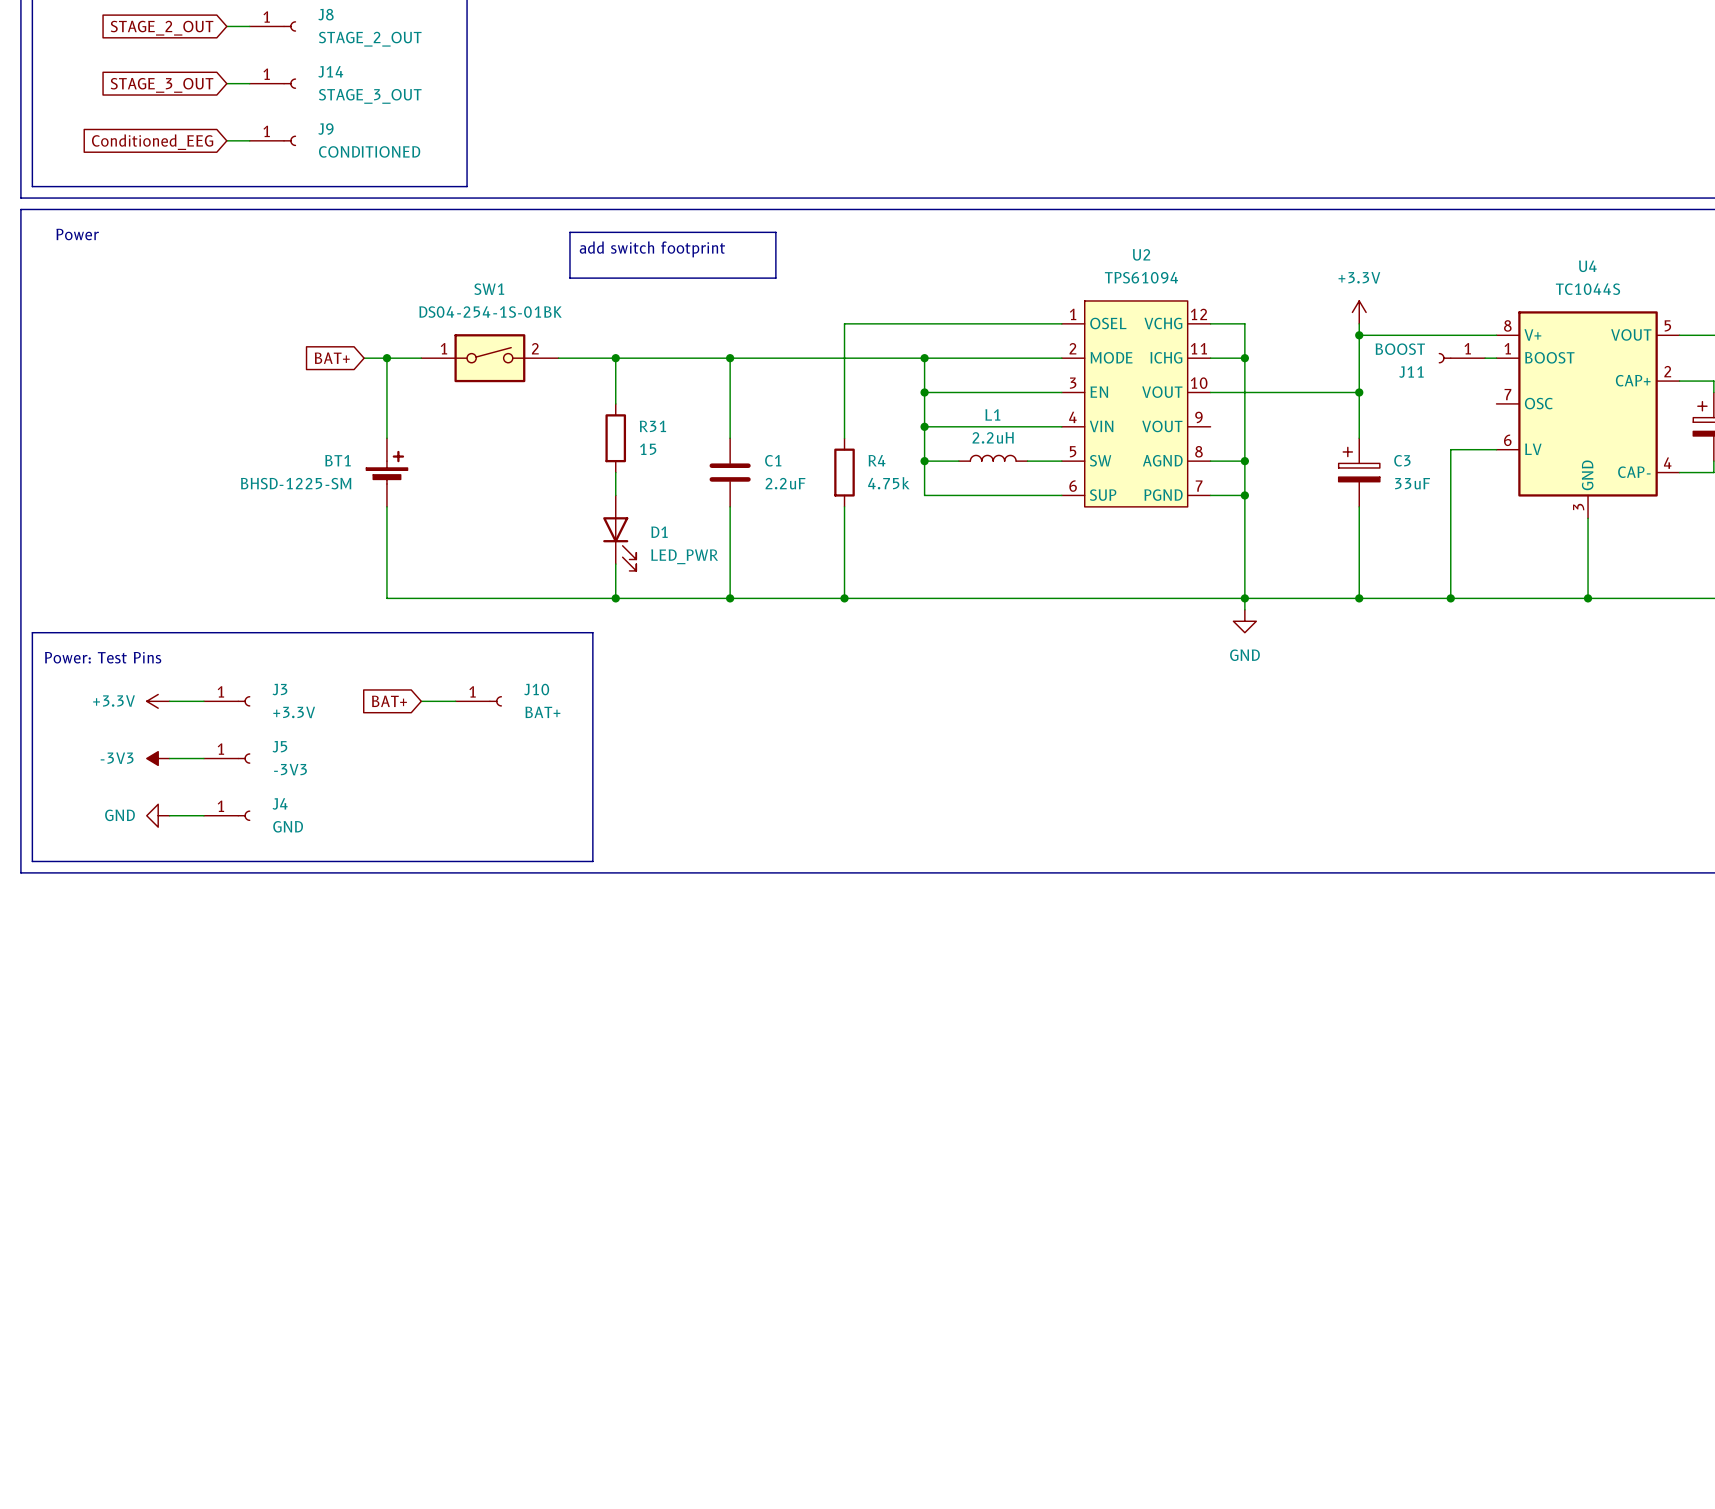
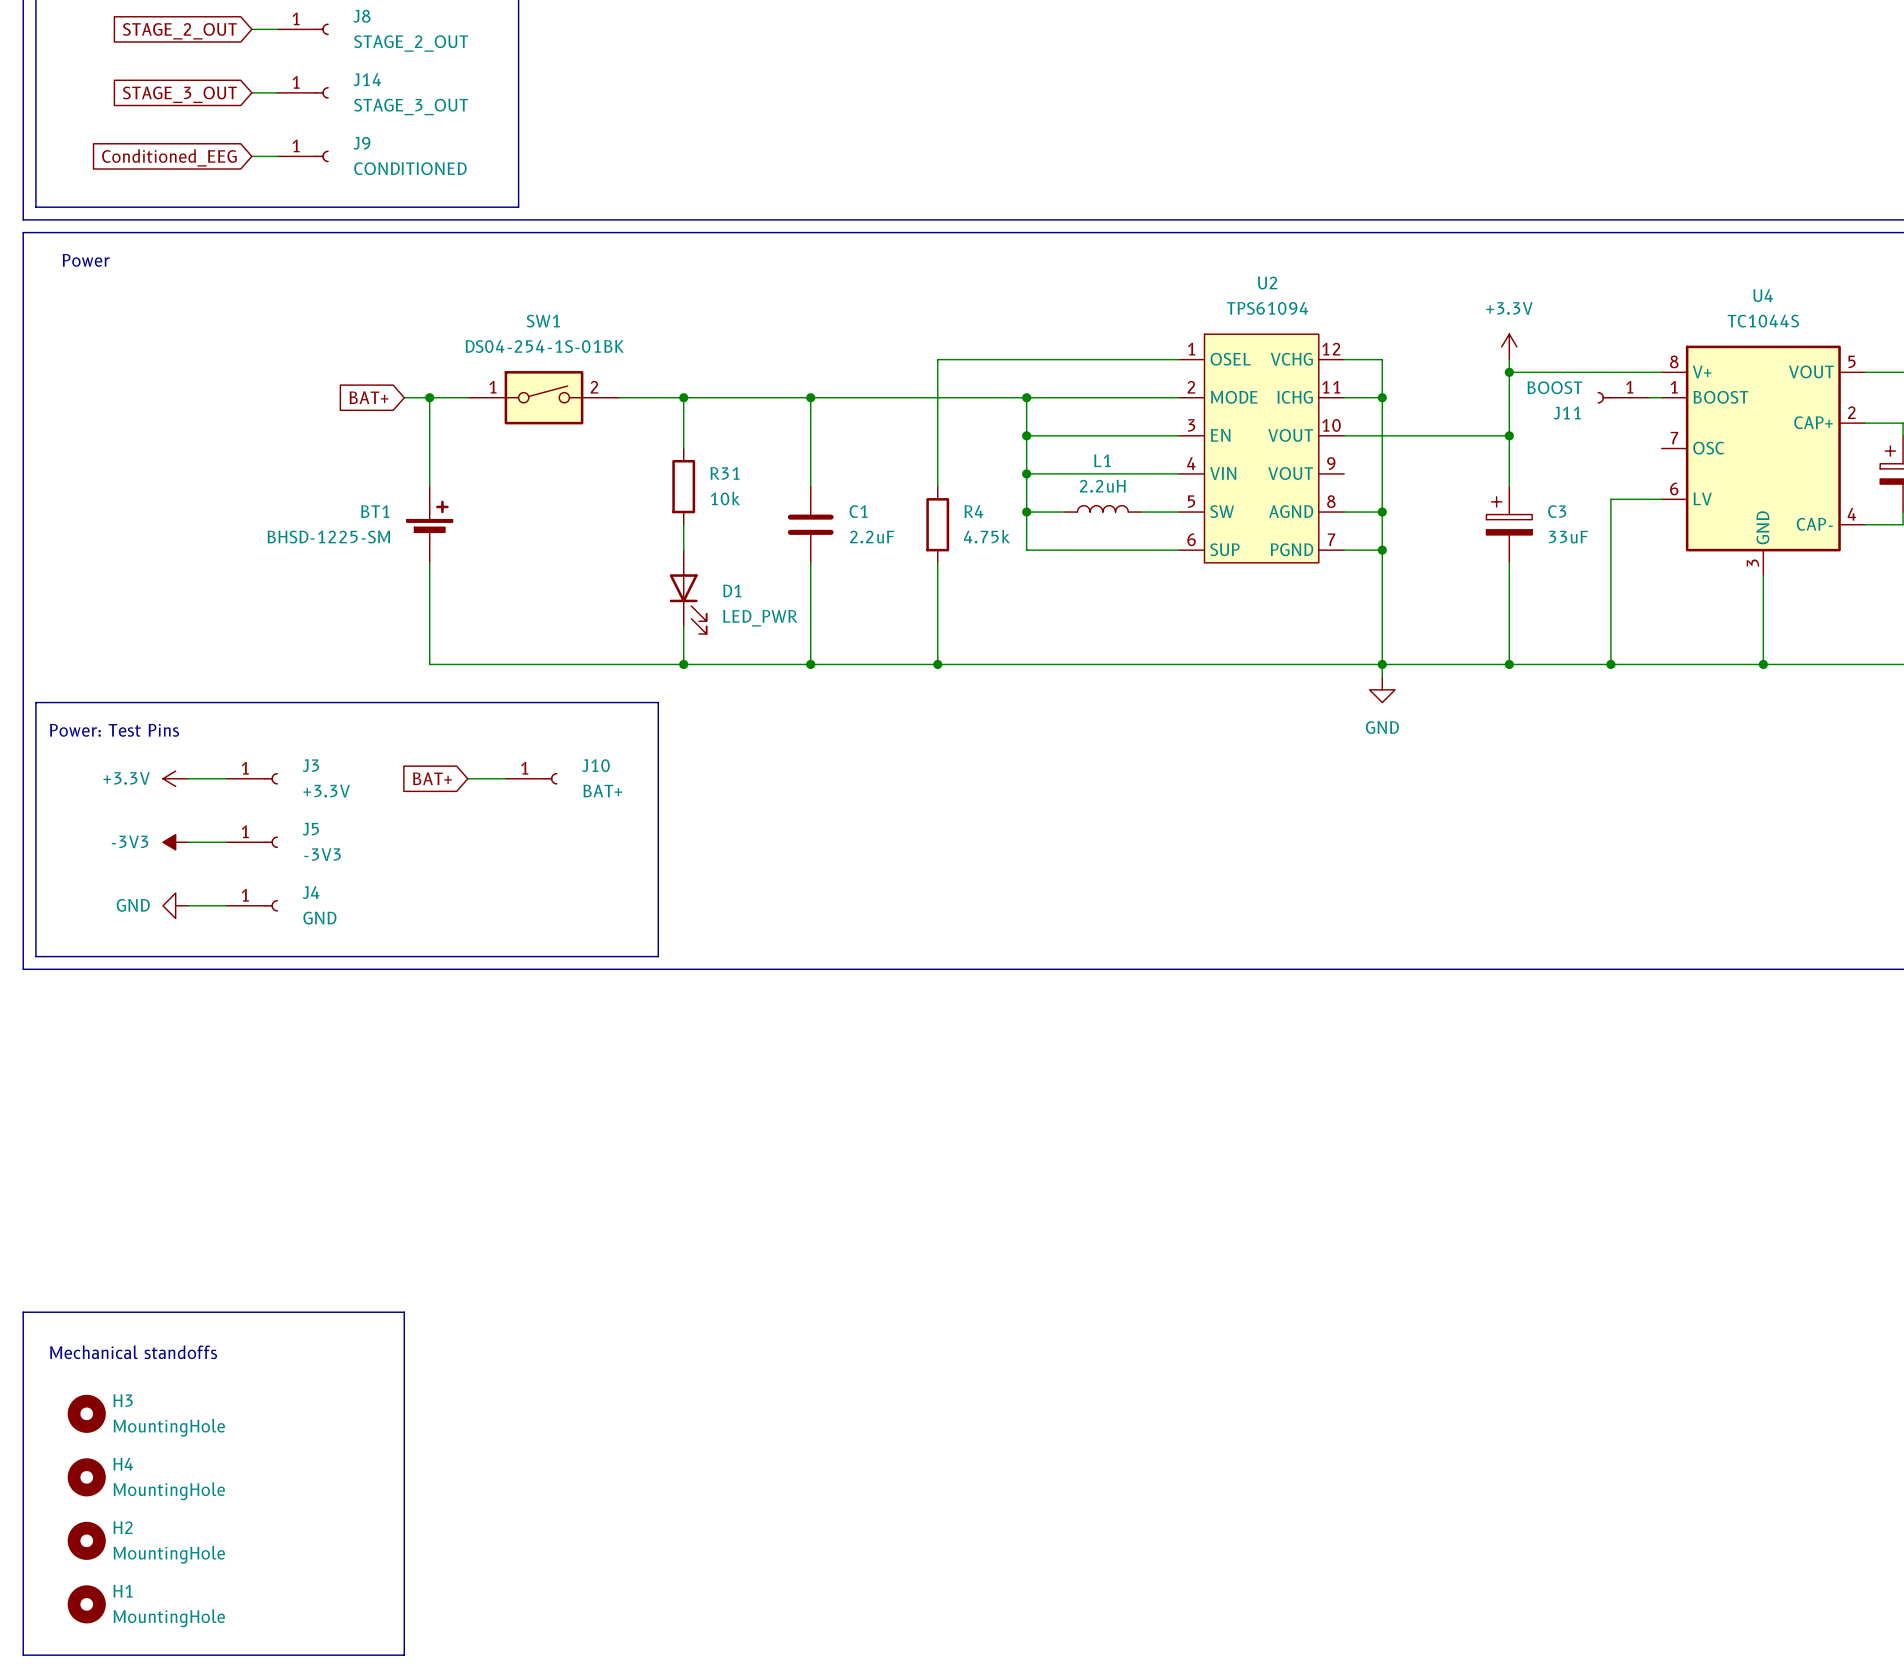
line: (569, 232) (775, 232) (775, 278) (569, 278) (569, 232) -> none
text: add switch footprint (652, 249) -> none
R31 value: 15 (648, 449) -> 10k (725, 498)
line: none -> (23, 1312) (23, 1655) (404, 1655) (404, 1312) (23, 1312)
text: none -> Mechanical standoffs (133, 1352)
H3: none -> MountingHole (86, 1413)
H4: none -> MountingHole (86, 1477)
H2: none -> MountingHole (86, 1540)
H1: none -> MountingHole (86, 1604)

